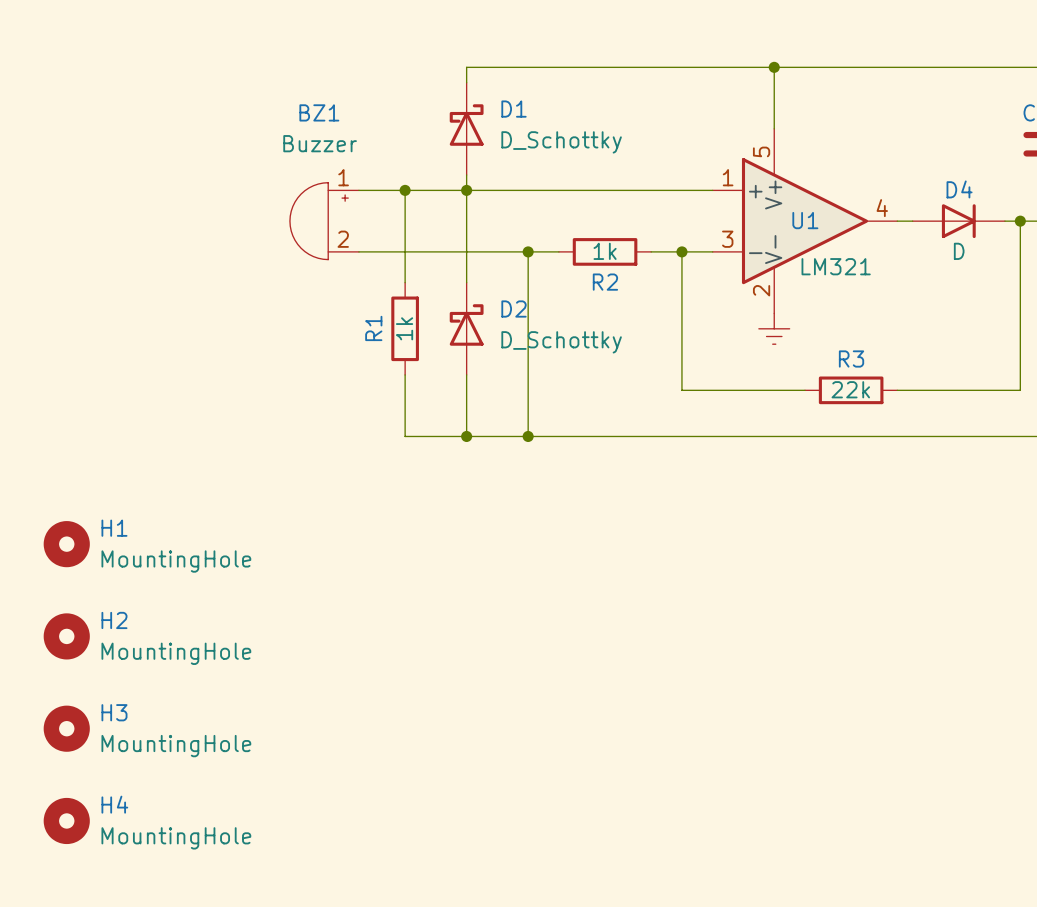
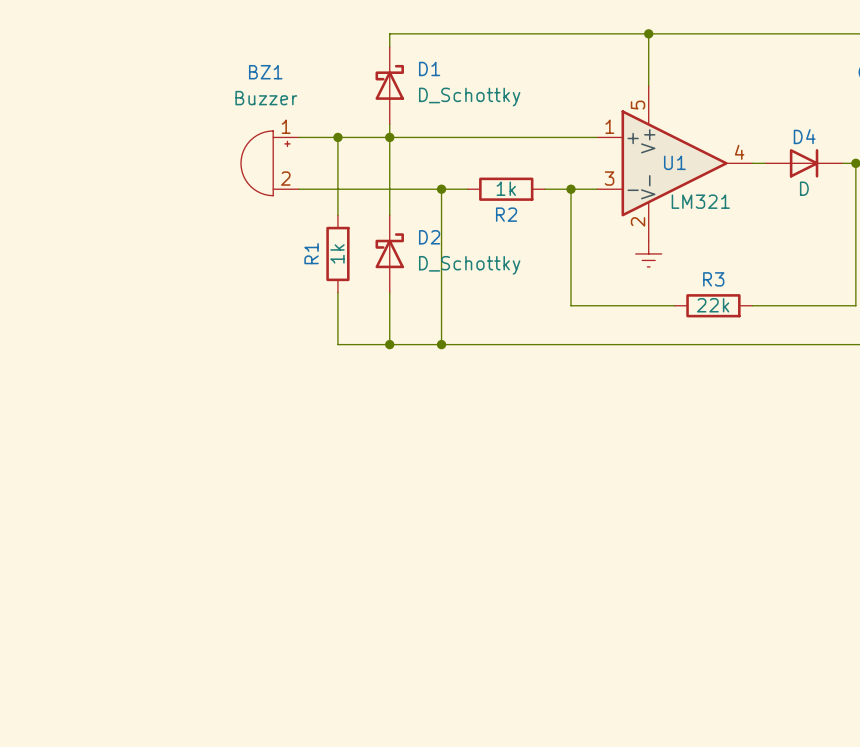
H1: MountingHole (66, 544) -> none
H2: MountingHole (66, 636) -> none
H3: MountingHole (66, 728) -> none
H4: MountingHole (66, 820) -> none

